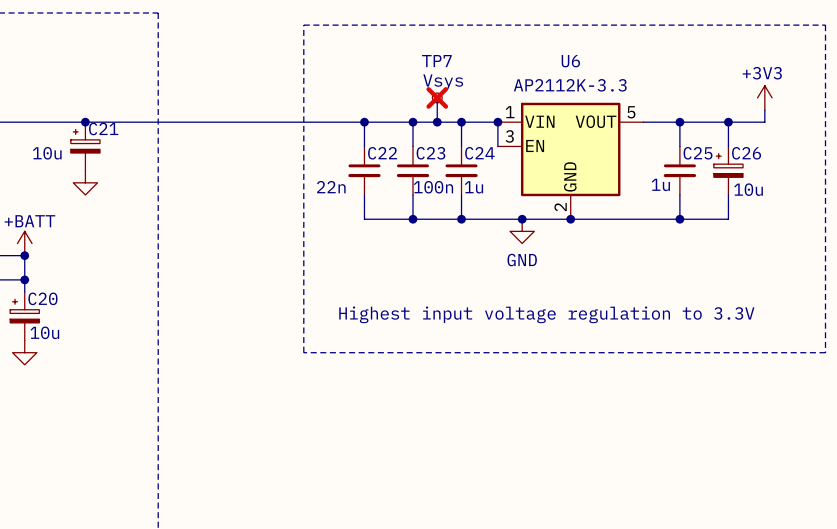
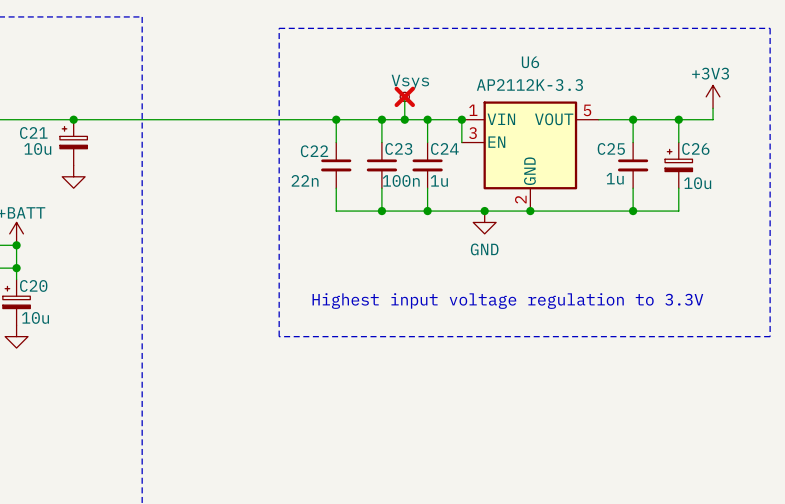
TP7 name: TP7 (436, 61) -> none
C21 name position: C21 (103, 129) -> C21 (33, 132)
C22 name position: C22 (382, 153) -> C22 (314, 151)
C25 name position: C25 (698, 153) -> C25 (611, 148)

